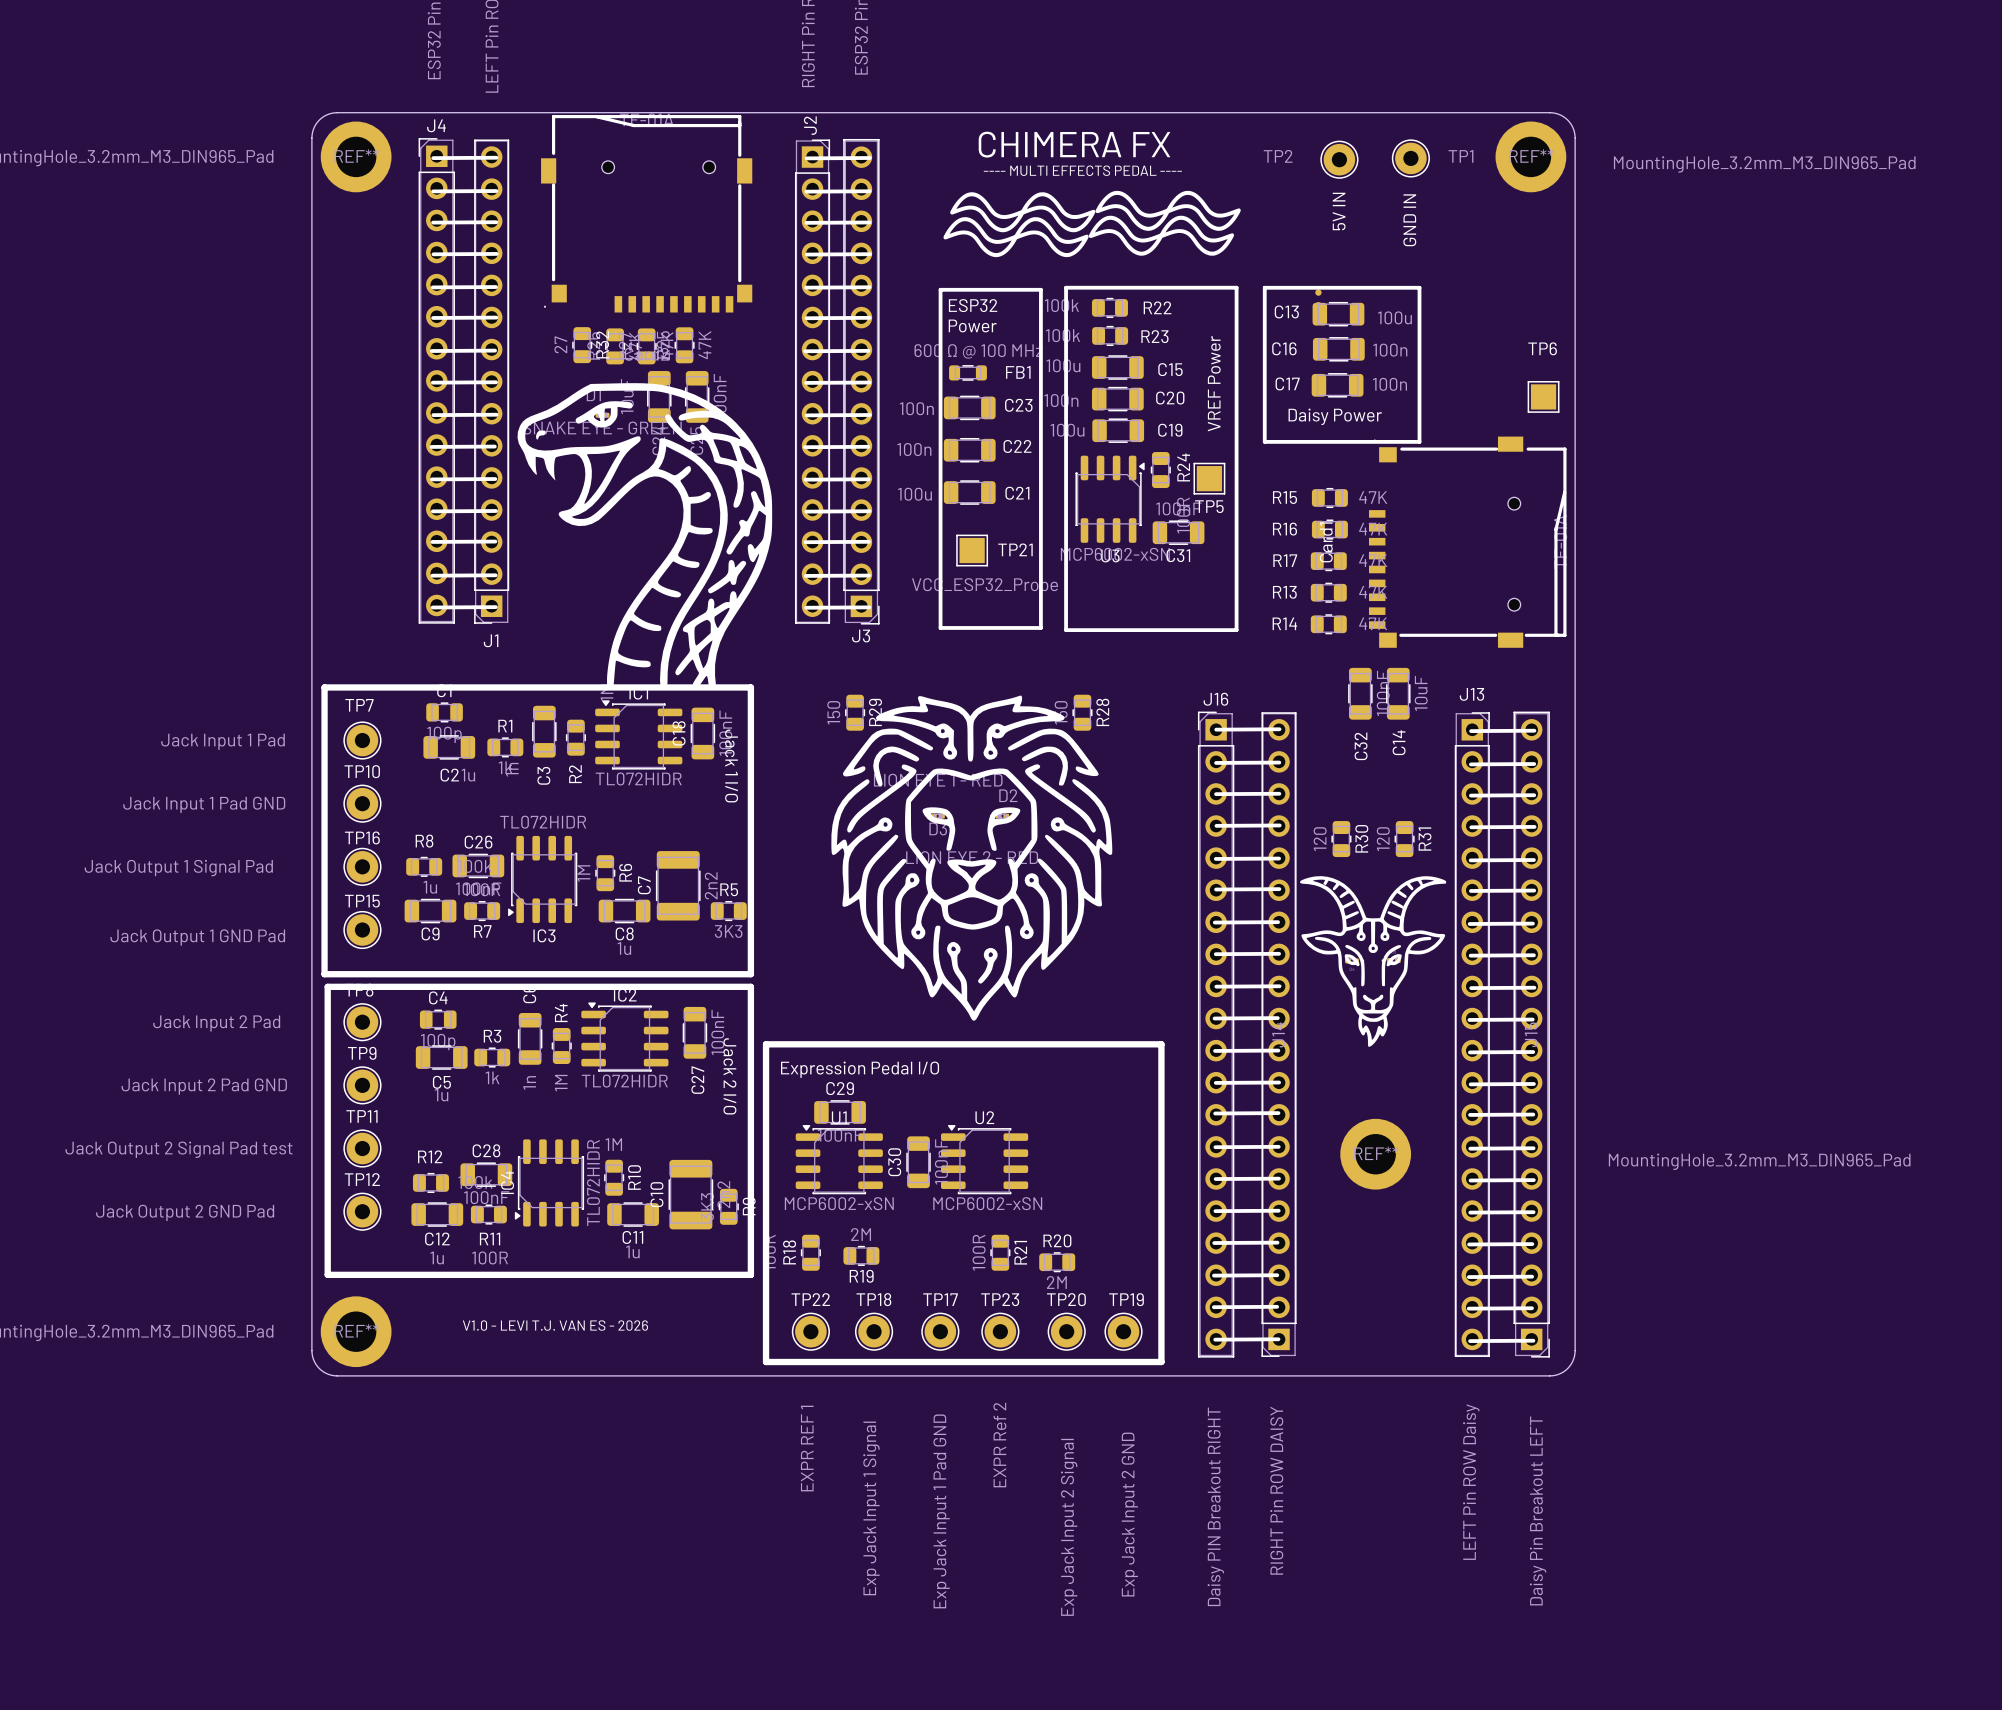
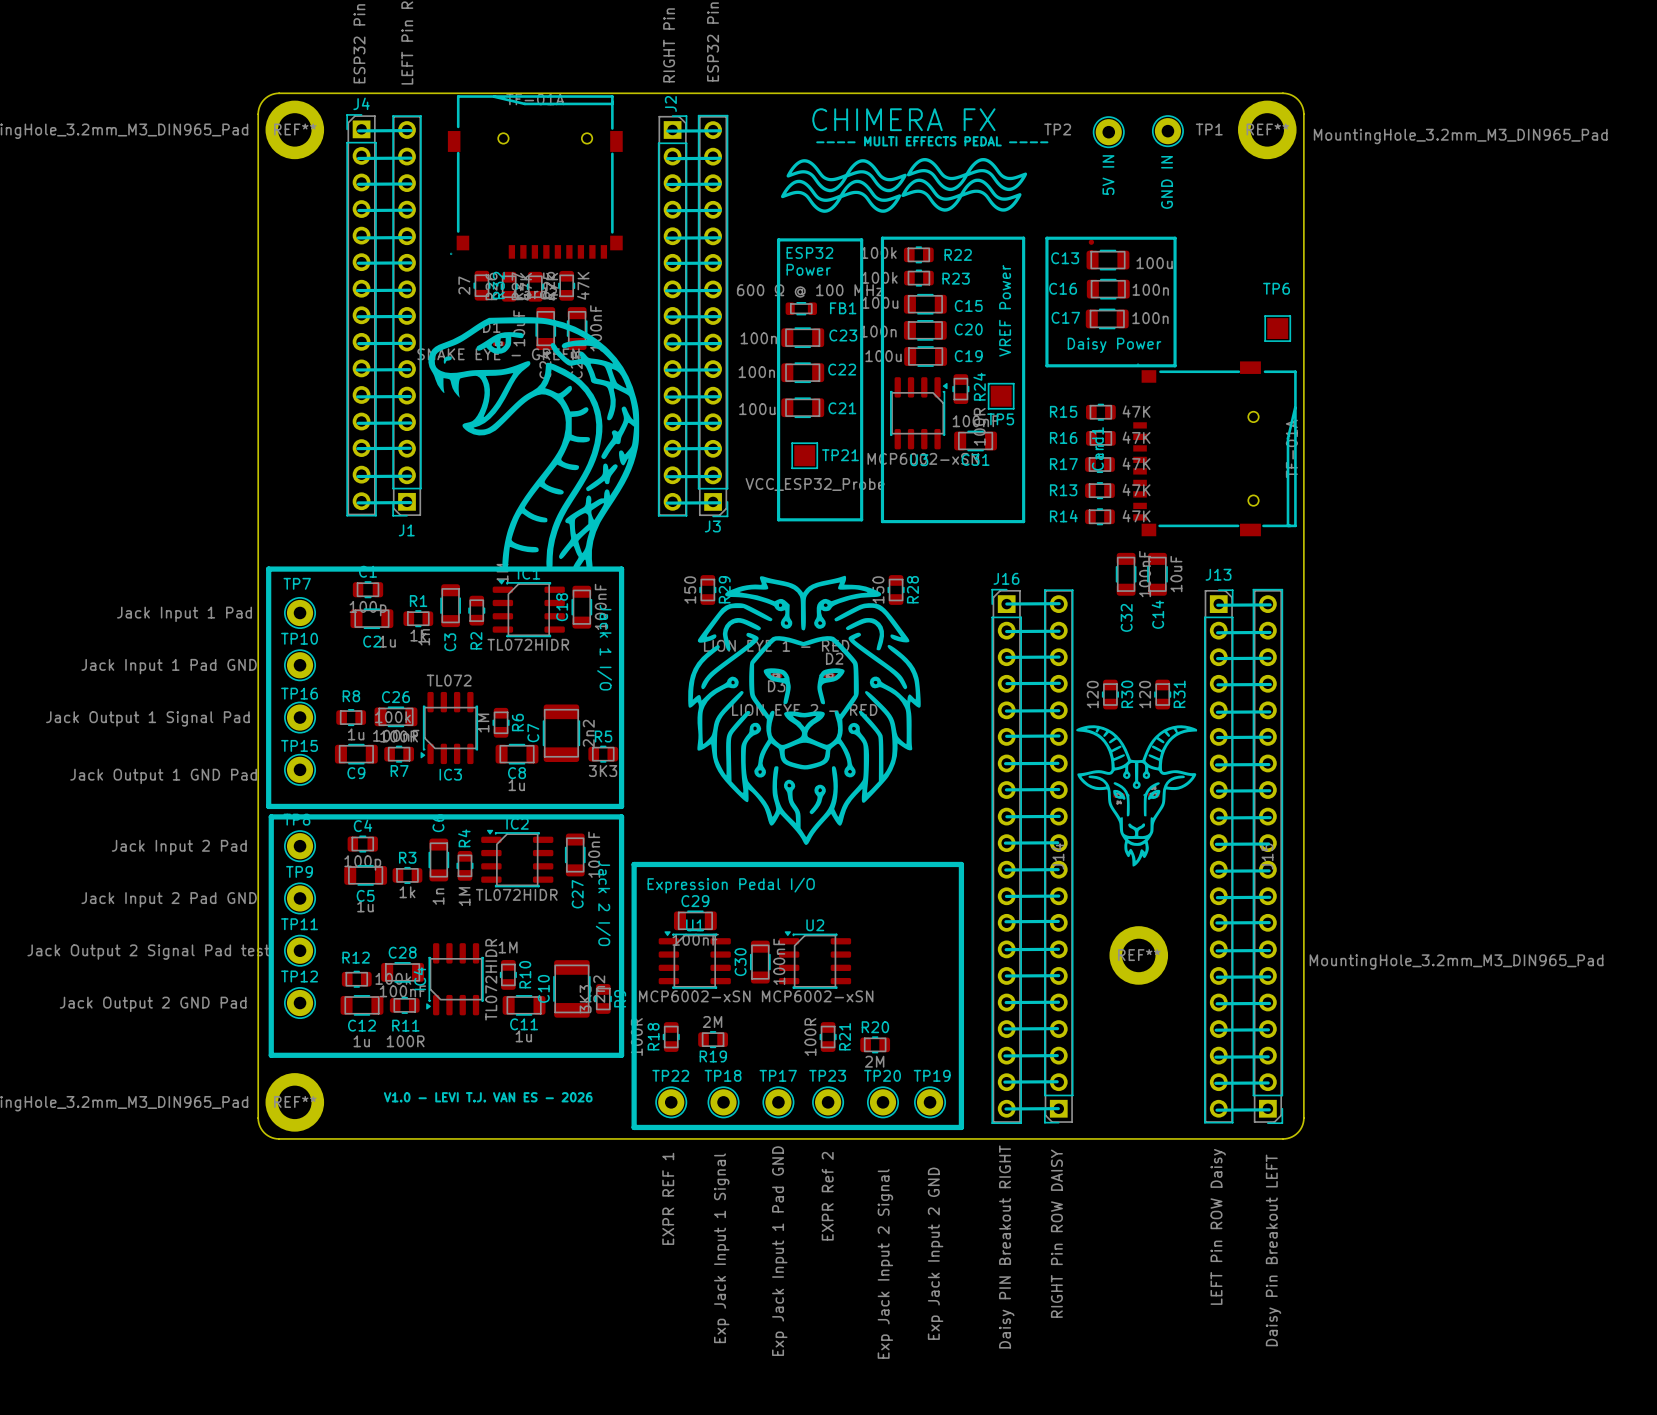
IC3 value: TL072HIDR (543, 822) -> TL072 (449, 680)

